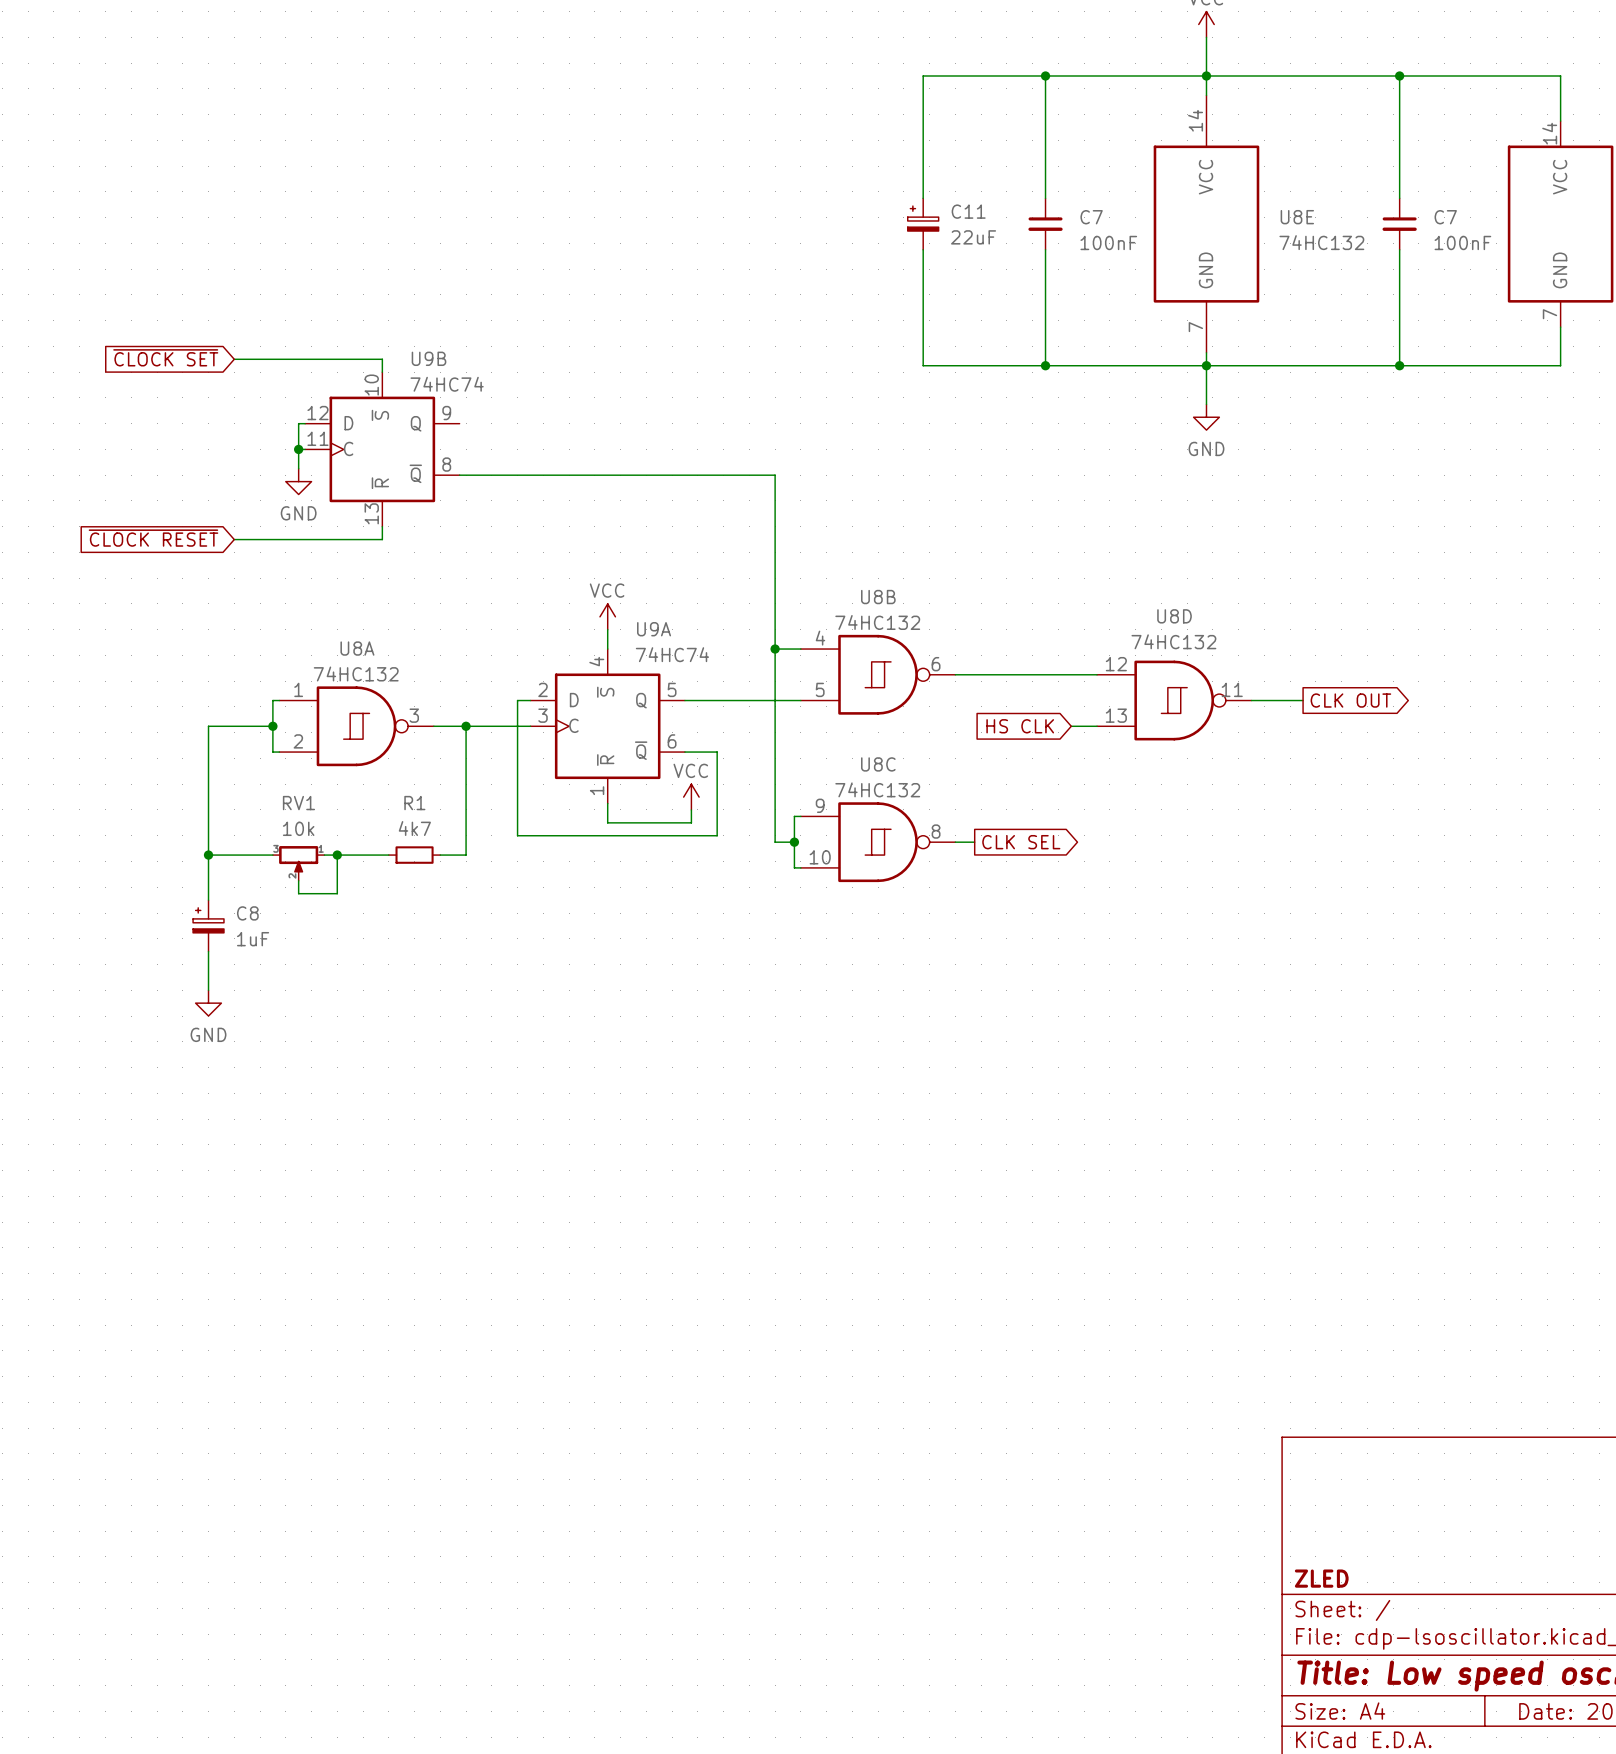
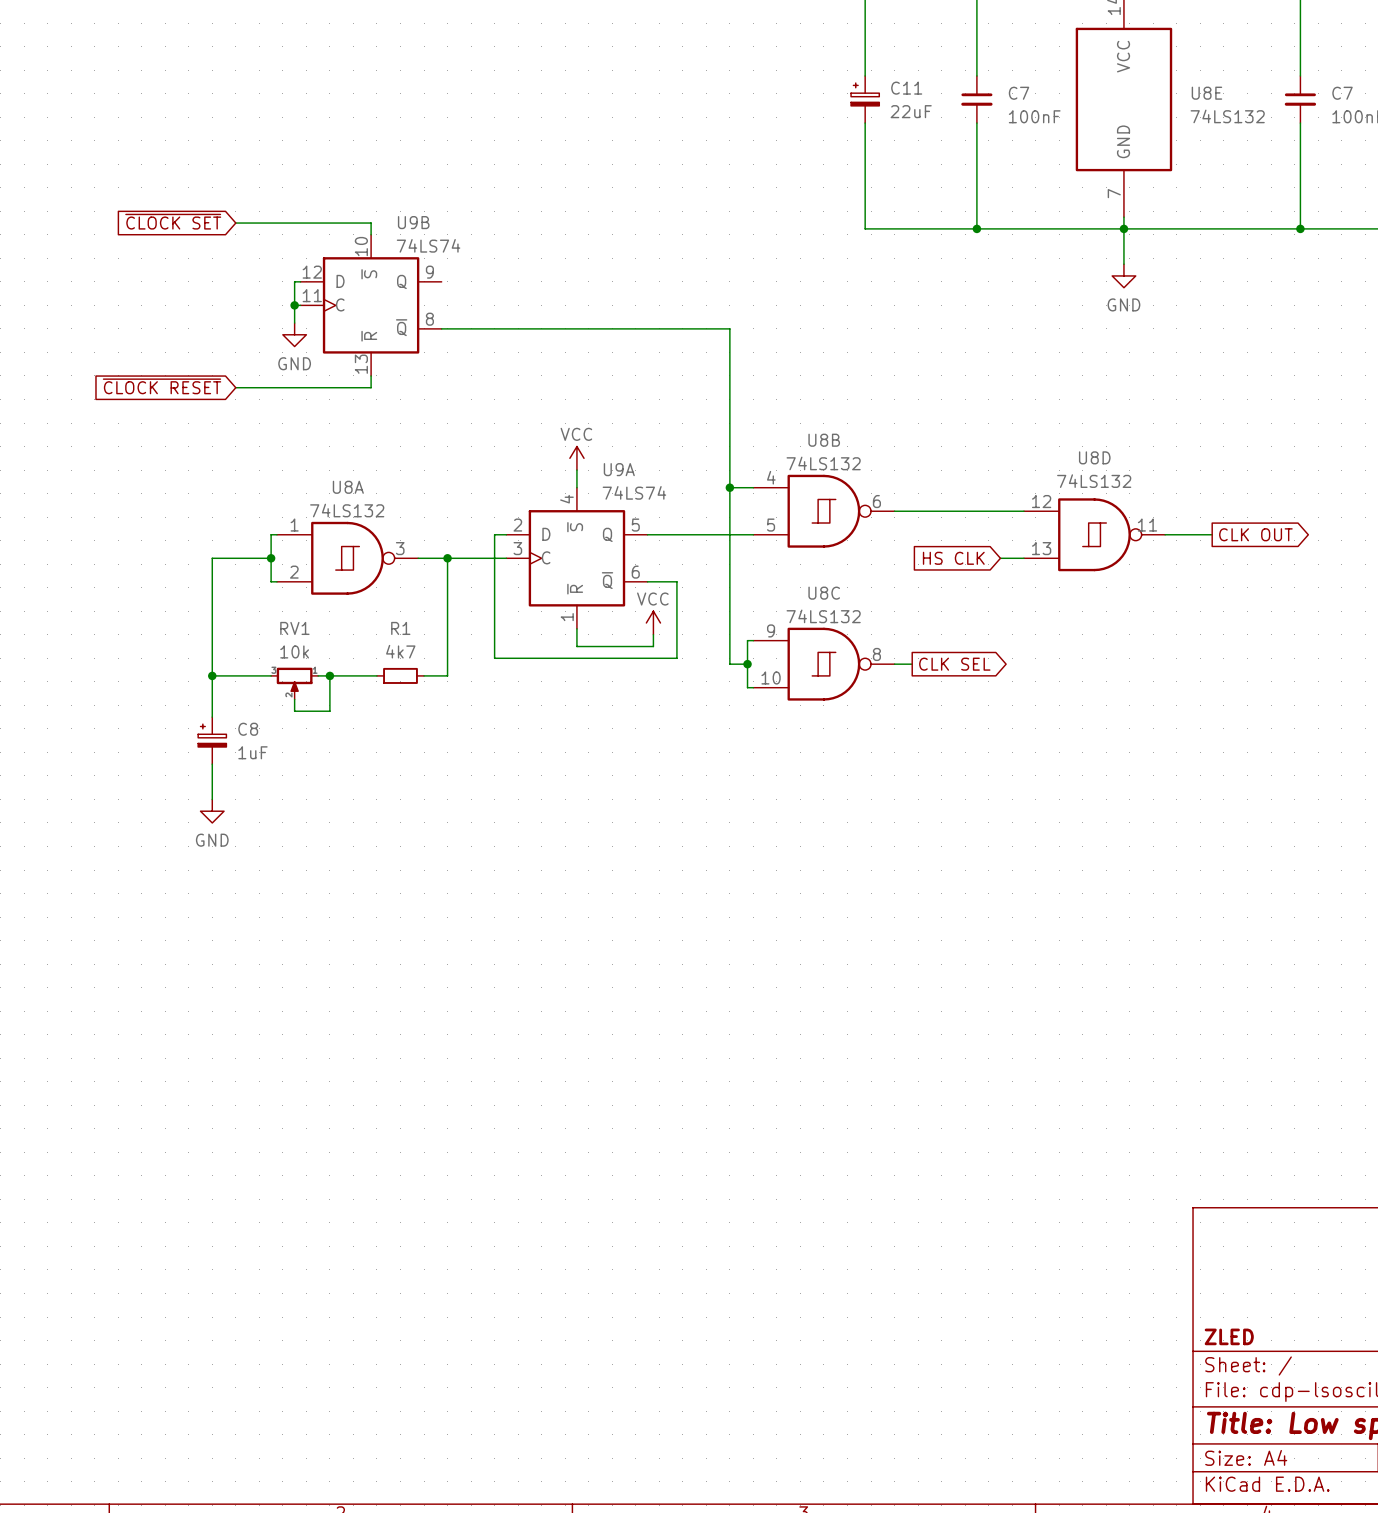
U8E value: 74HC132 (1321, 242) -> 74LS132 (1227, 116)
U9B value: 74HC74 (447, 384) -> 74LS74 (428, 245)
U8B value: 74HC132 (877, 622) -> 74LS132 (823, 463)
U8D value: 74HC132 (1173, 641) -> 74LS132 (1094, 481)
U9A value: 74HC74 (672, 654) -> 74LS74 (634, 492)
U8A value: 74HC132 (356, 673) -> 74LS132 (347, 510)
U8C value: 74HC132 (877, 789) -> 74LS132 (823, 616)

